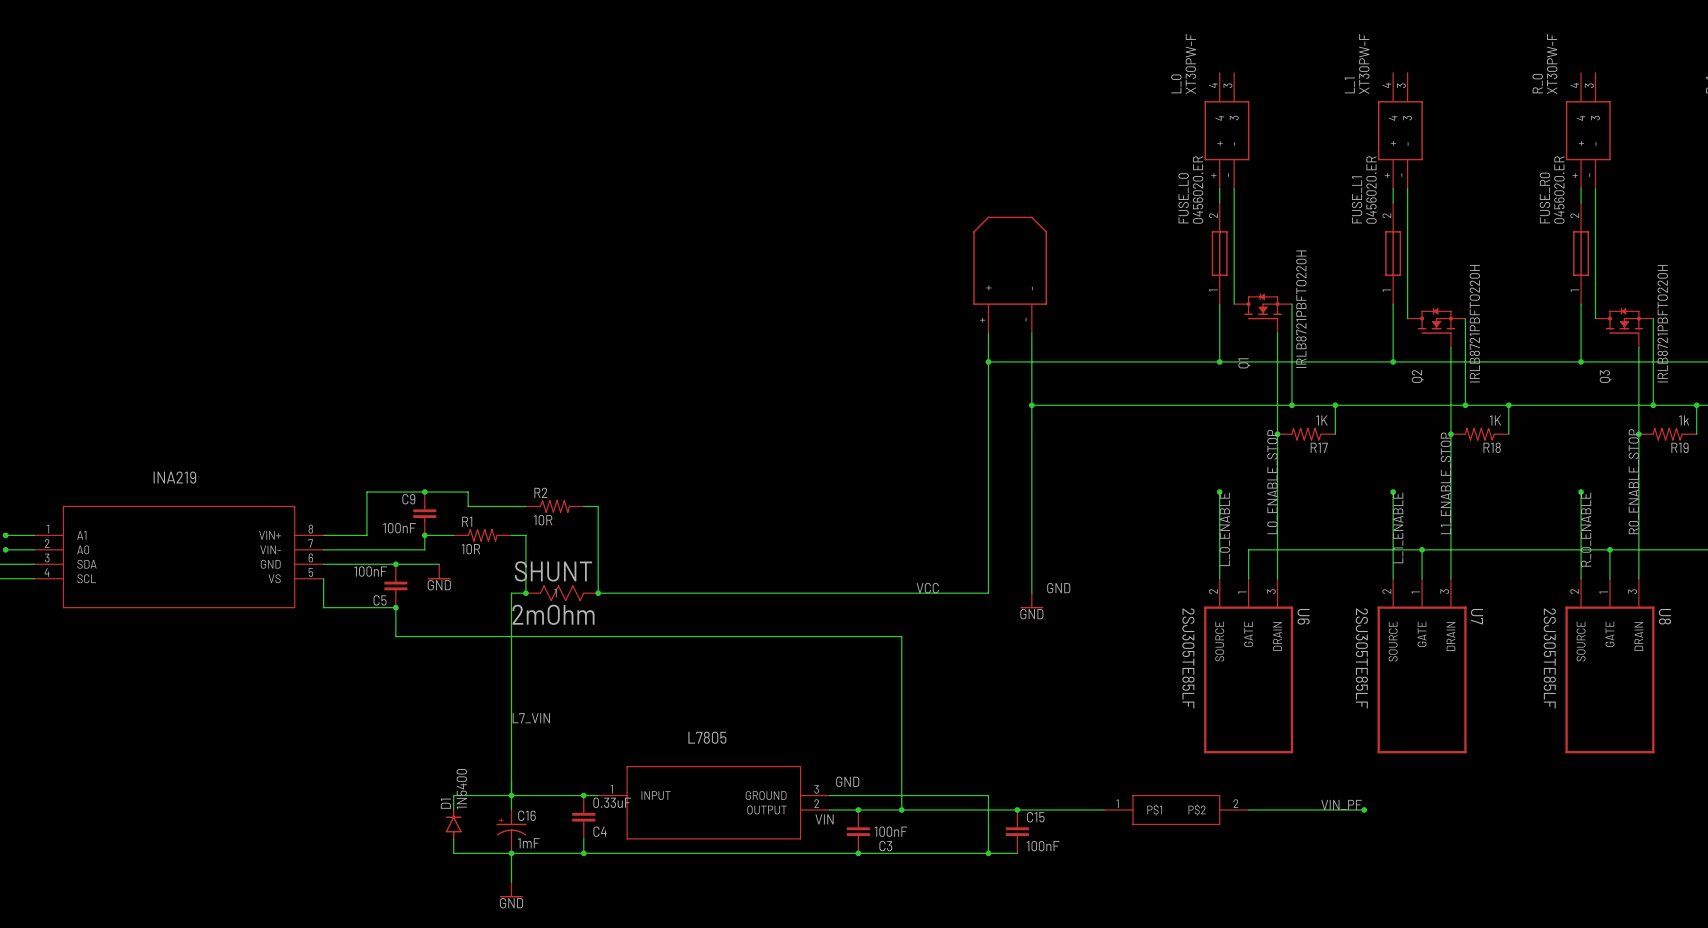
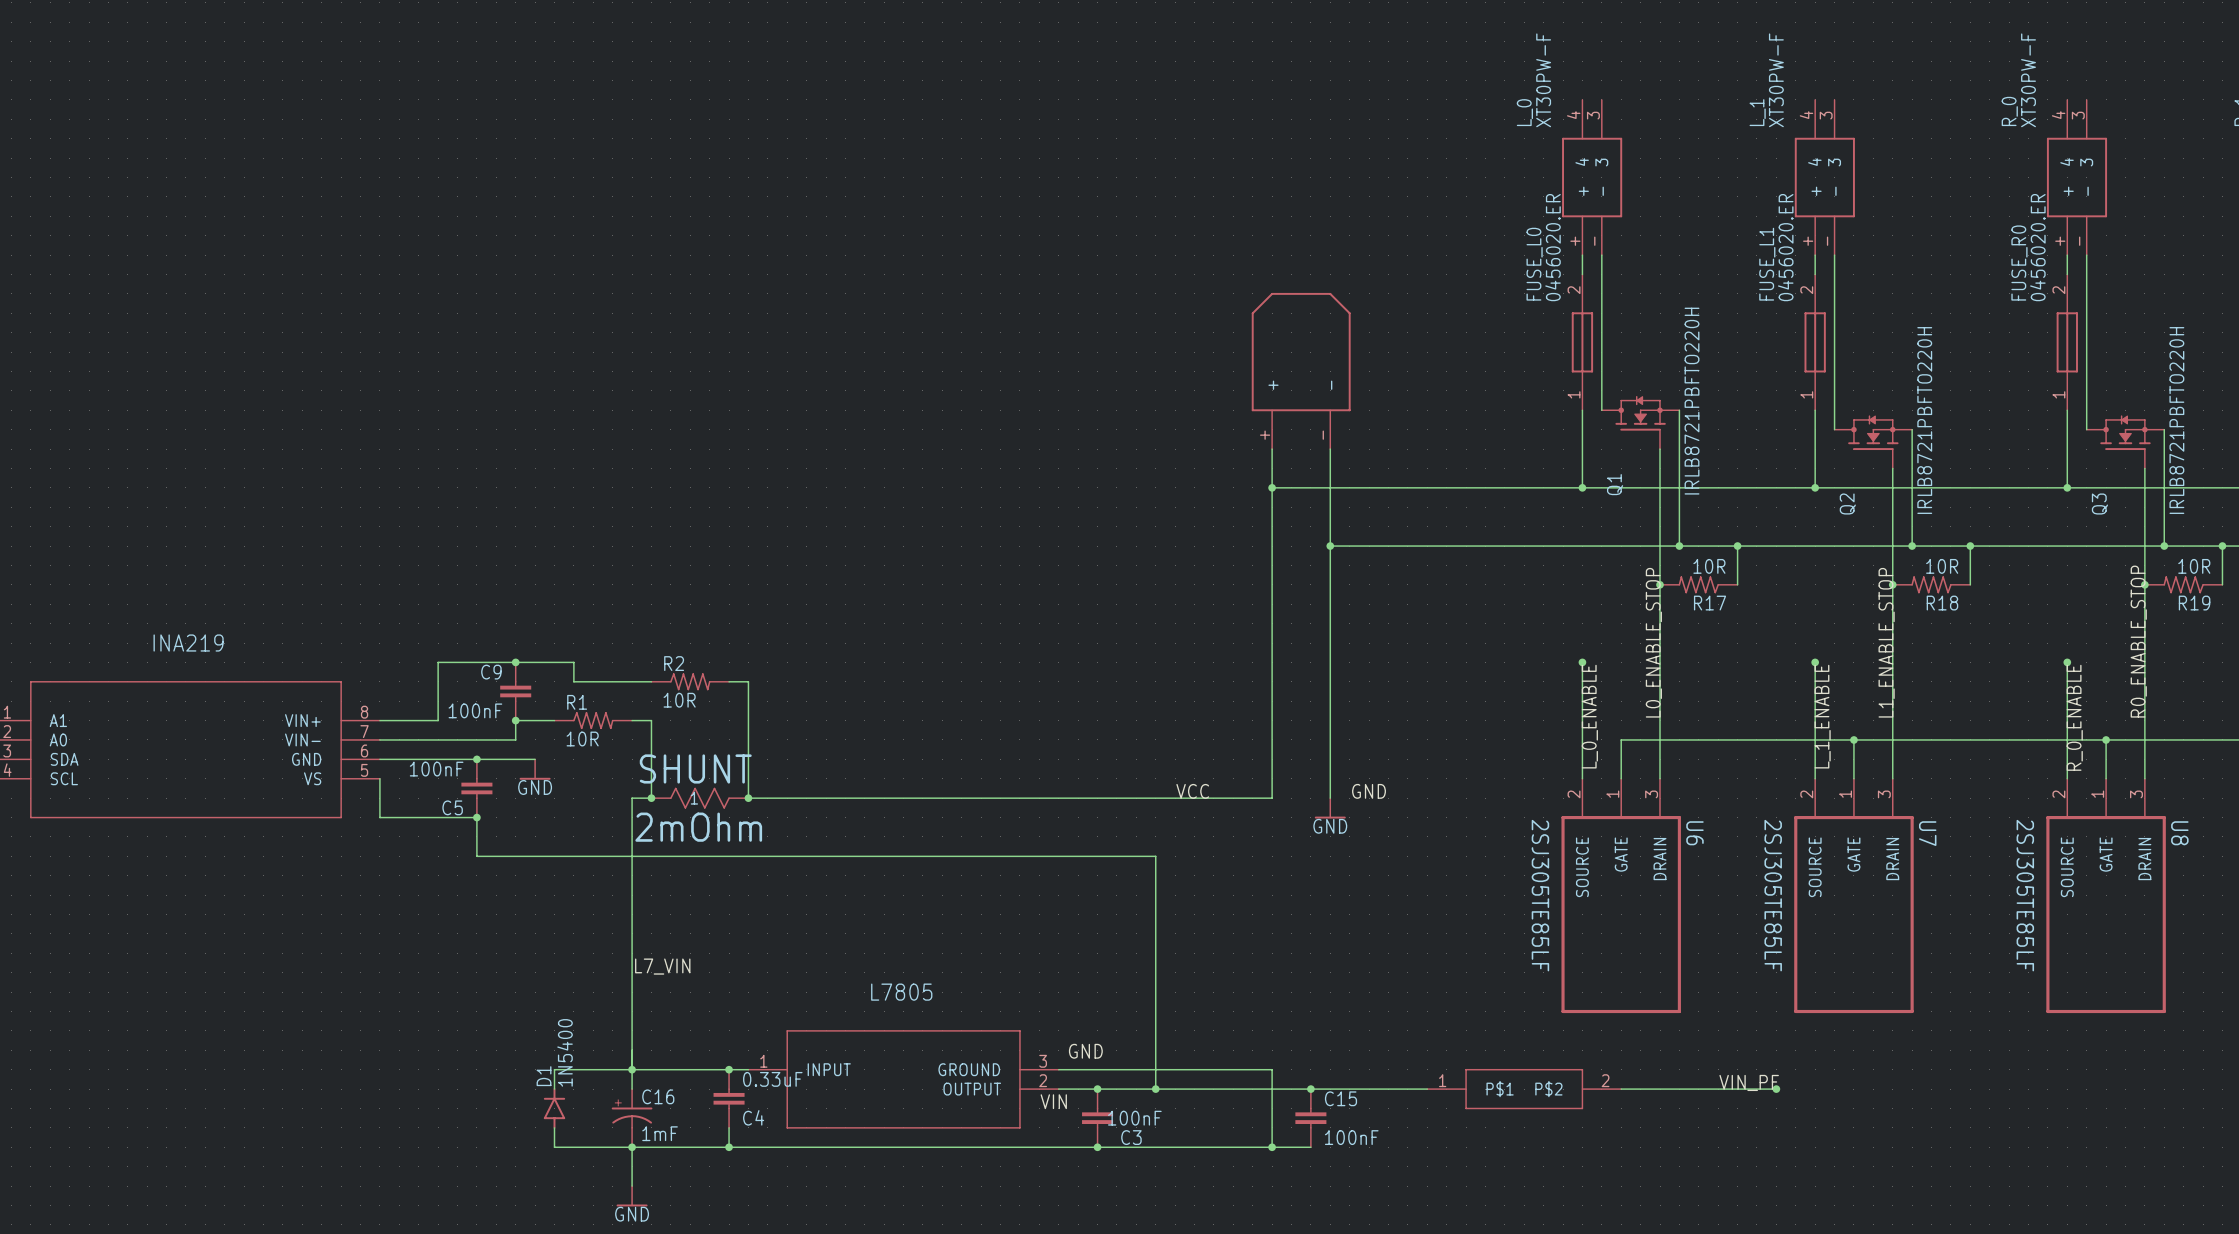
R17 value: 1K (1322, 420) -> 10R (1709, 566)
R18 value: 1K (1495, 420) -> 10R (1942, 566)
R19 value: 1k (1684, 420) -> 10R (2194, 566)

